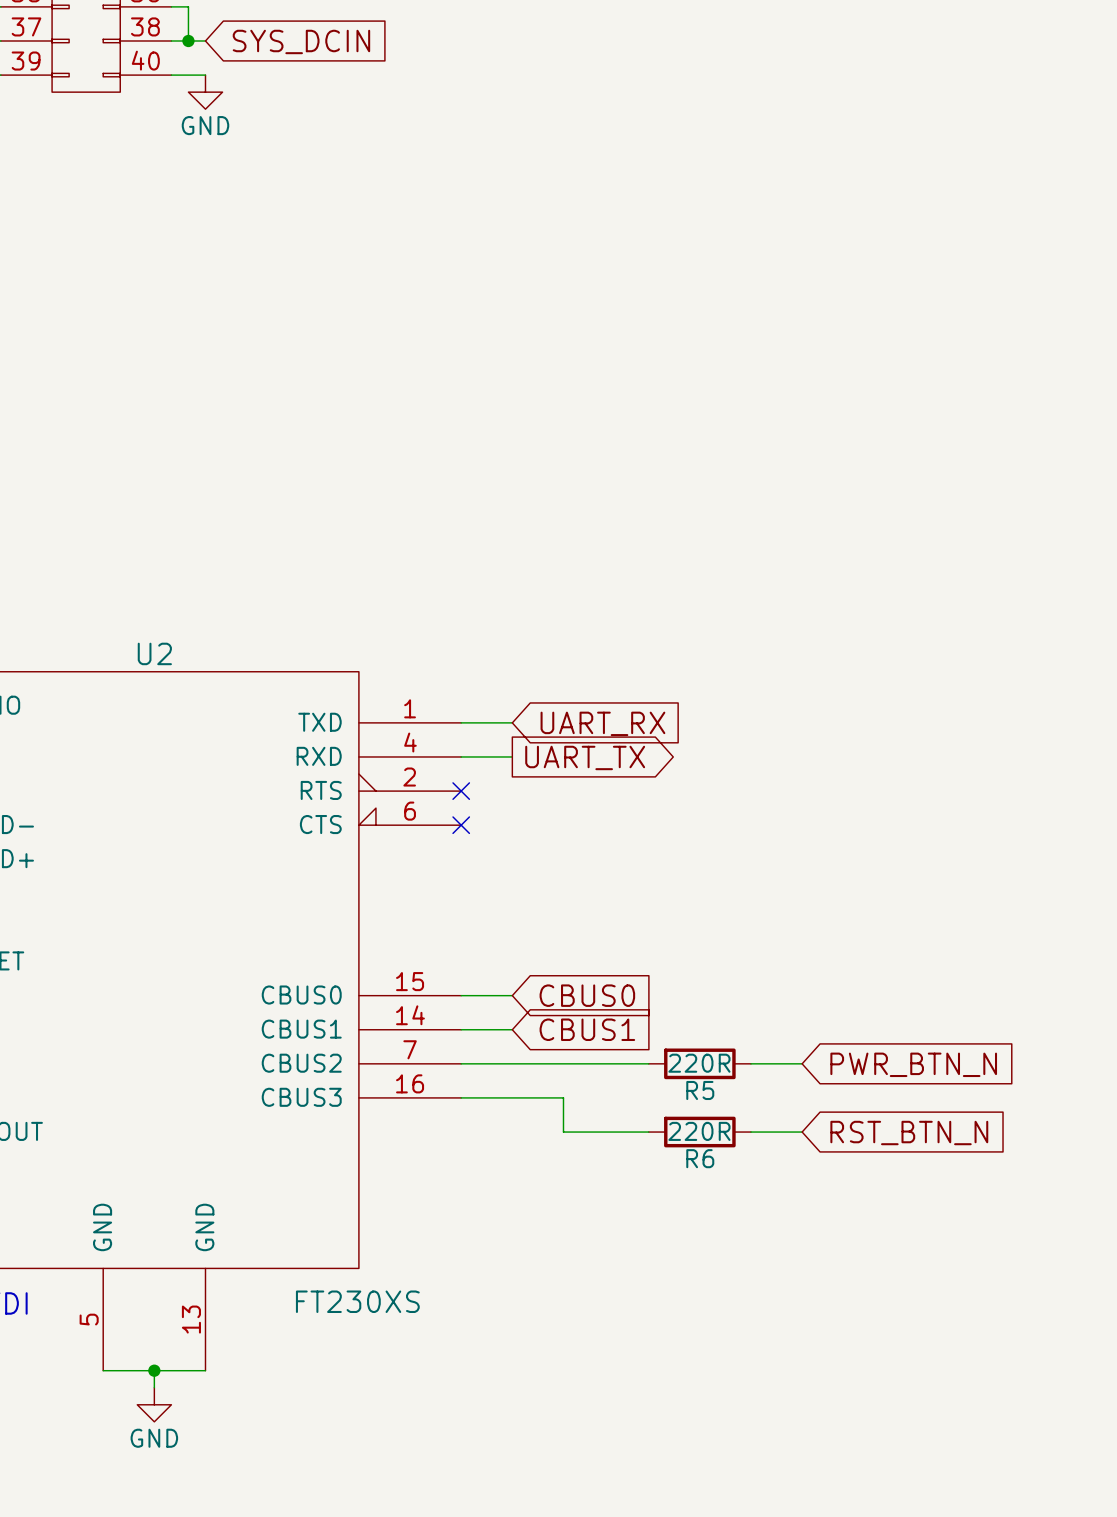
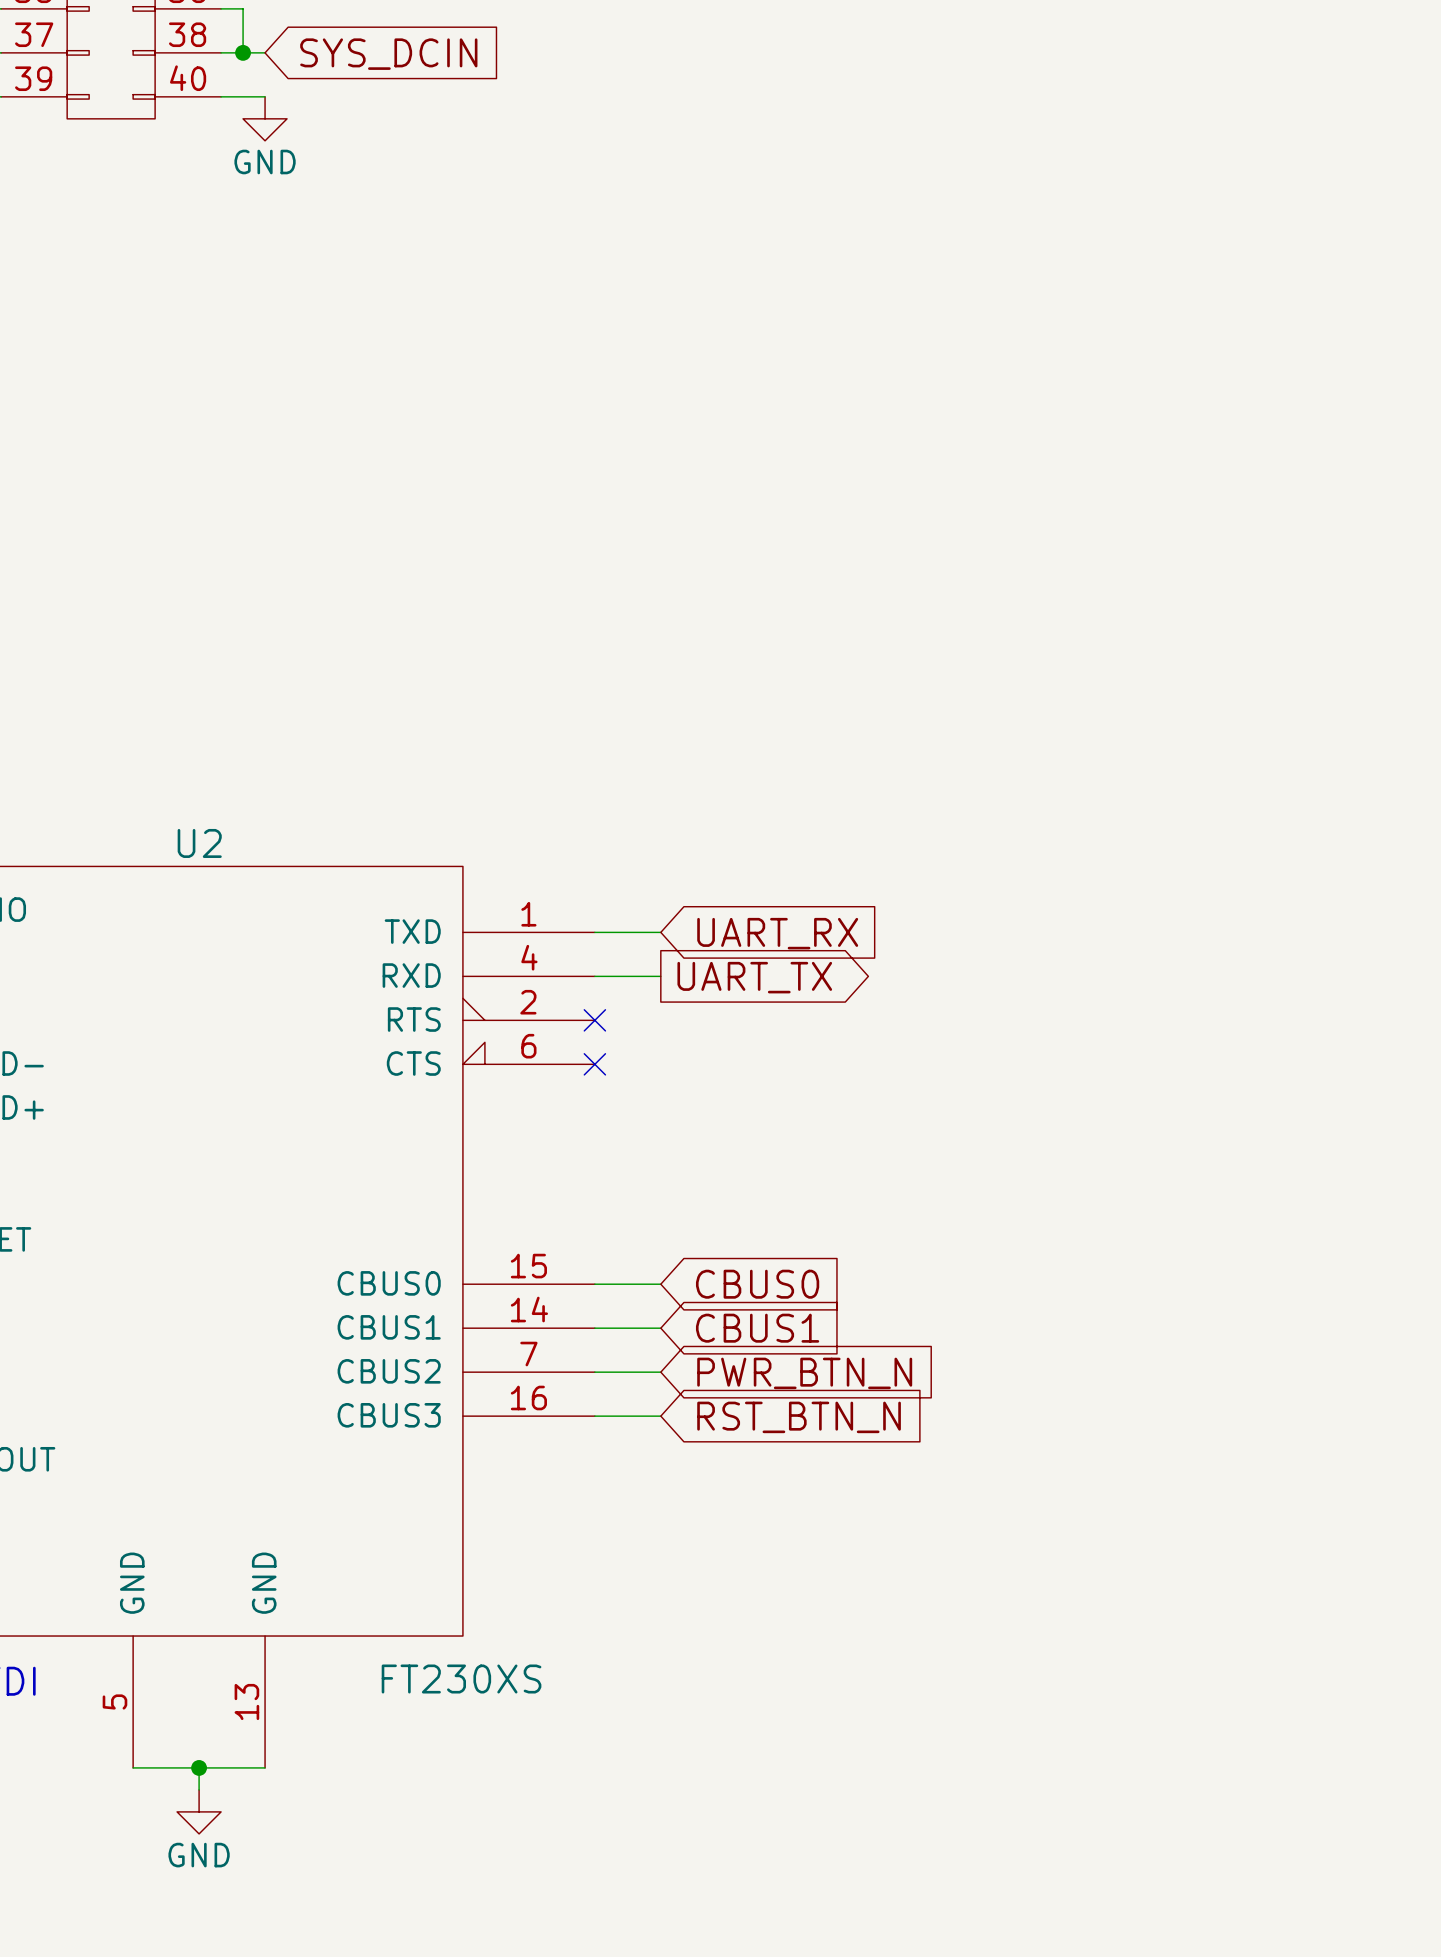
wire: (512, 1063) (648, 1063) -> none
R5: 220R (699, 1063) -> none
wire: (751, 1063) (802, 1063) -> none
global label position: PWR_BTN_N (913, 1064) -> PWR_BTN_N (804, 1373)
wire: (512, 1097) (563, 1097) (563, 1132) (648, 1132) -> none
R6: 220R (699, 1132) -> none
wire: (751, 1132) (802, 1132) -> none
global label position: RST_BTN_N (909, 1133) -> RST_BTN_N (799, 1417)

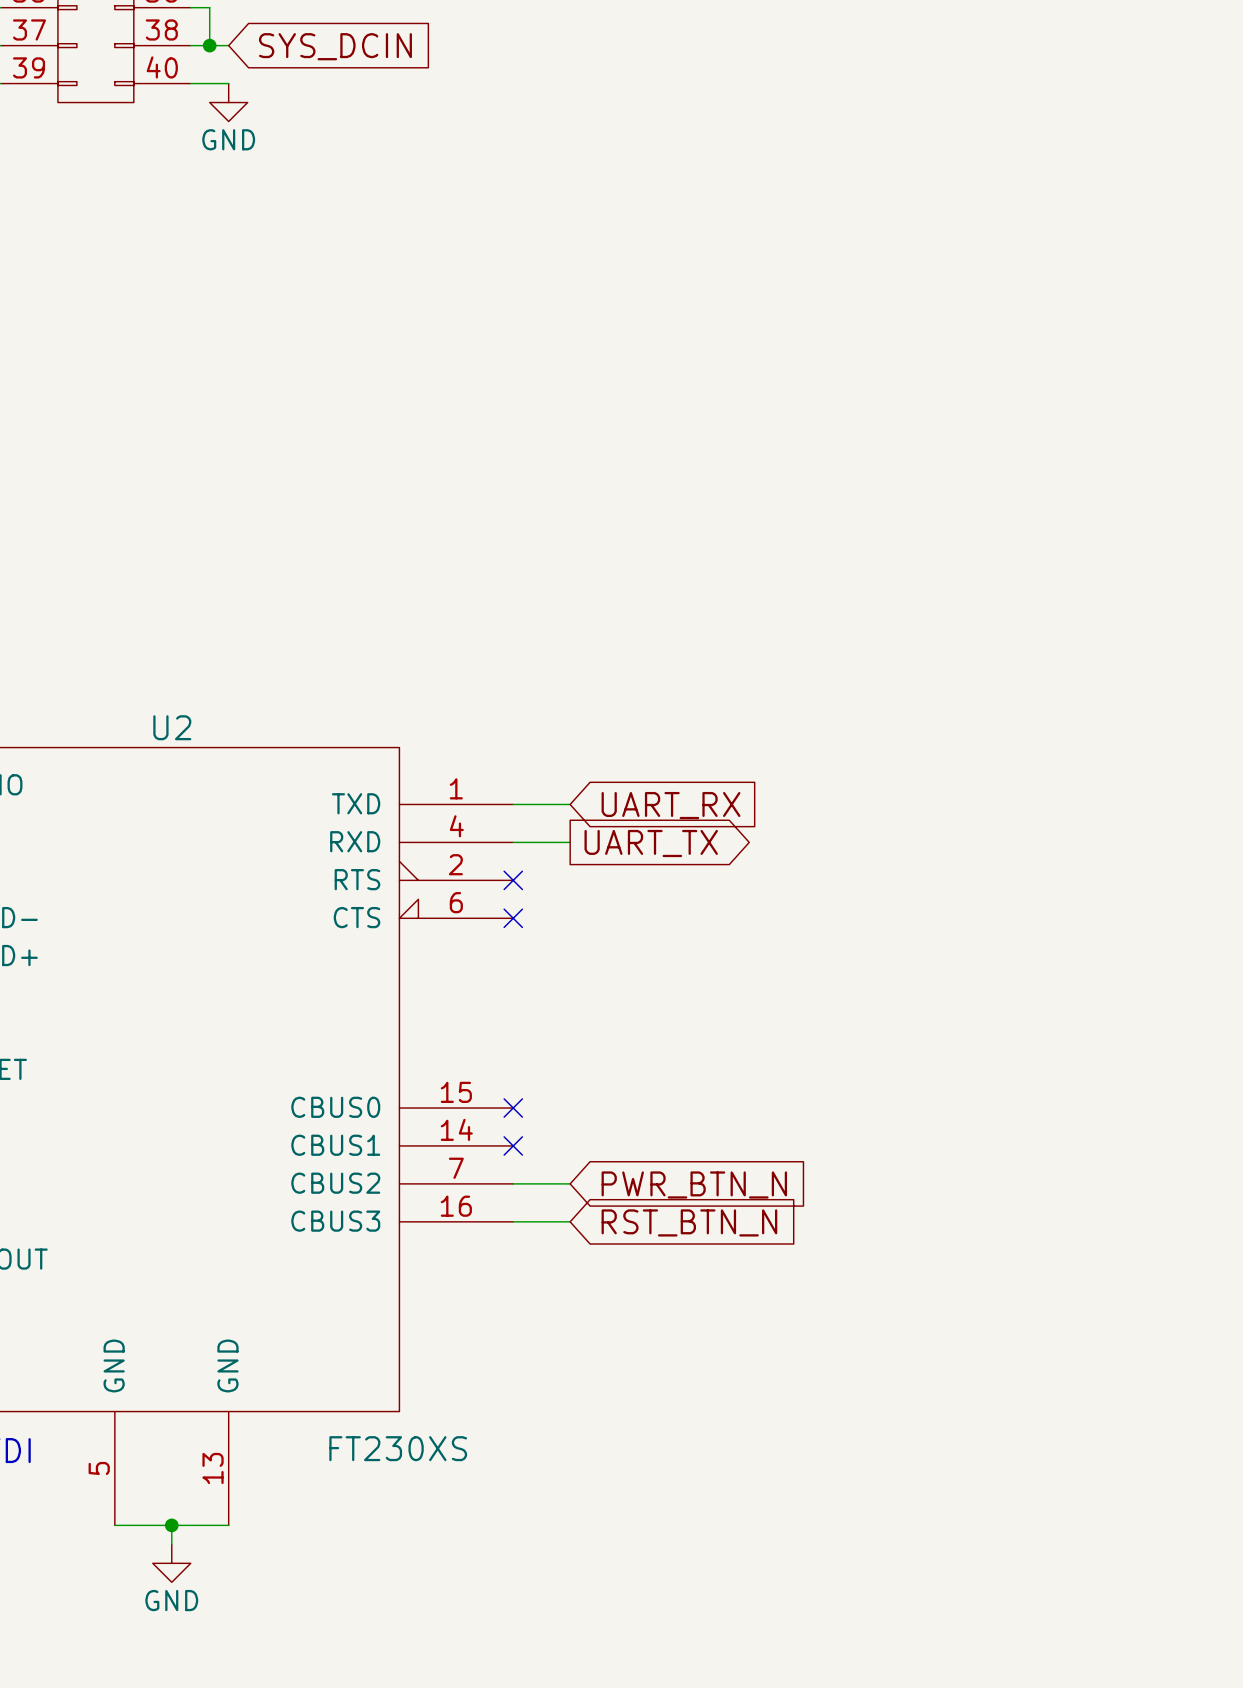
wire: (594, 1284) (660, 1284) -> none
no-connect mark: none -> (513, 1108)
global label: CBUS0 (757, 1284) -> none
wire: (594, 1328) (660, 1328) -> none
no-connect mark: none -> (513, 1145)
global label: CBUS1 (757, 1328) -> none

